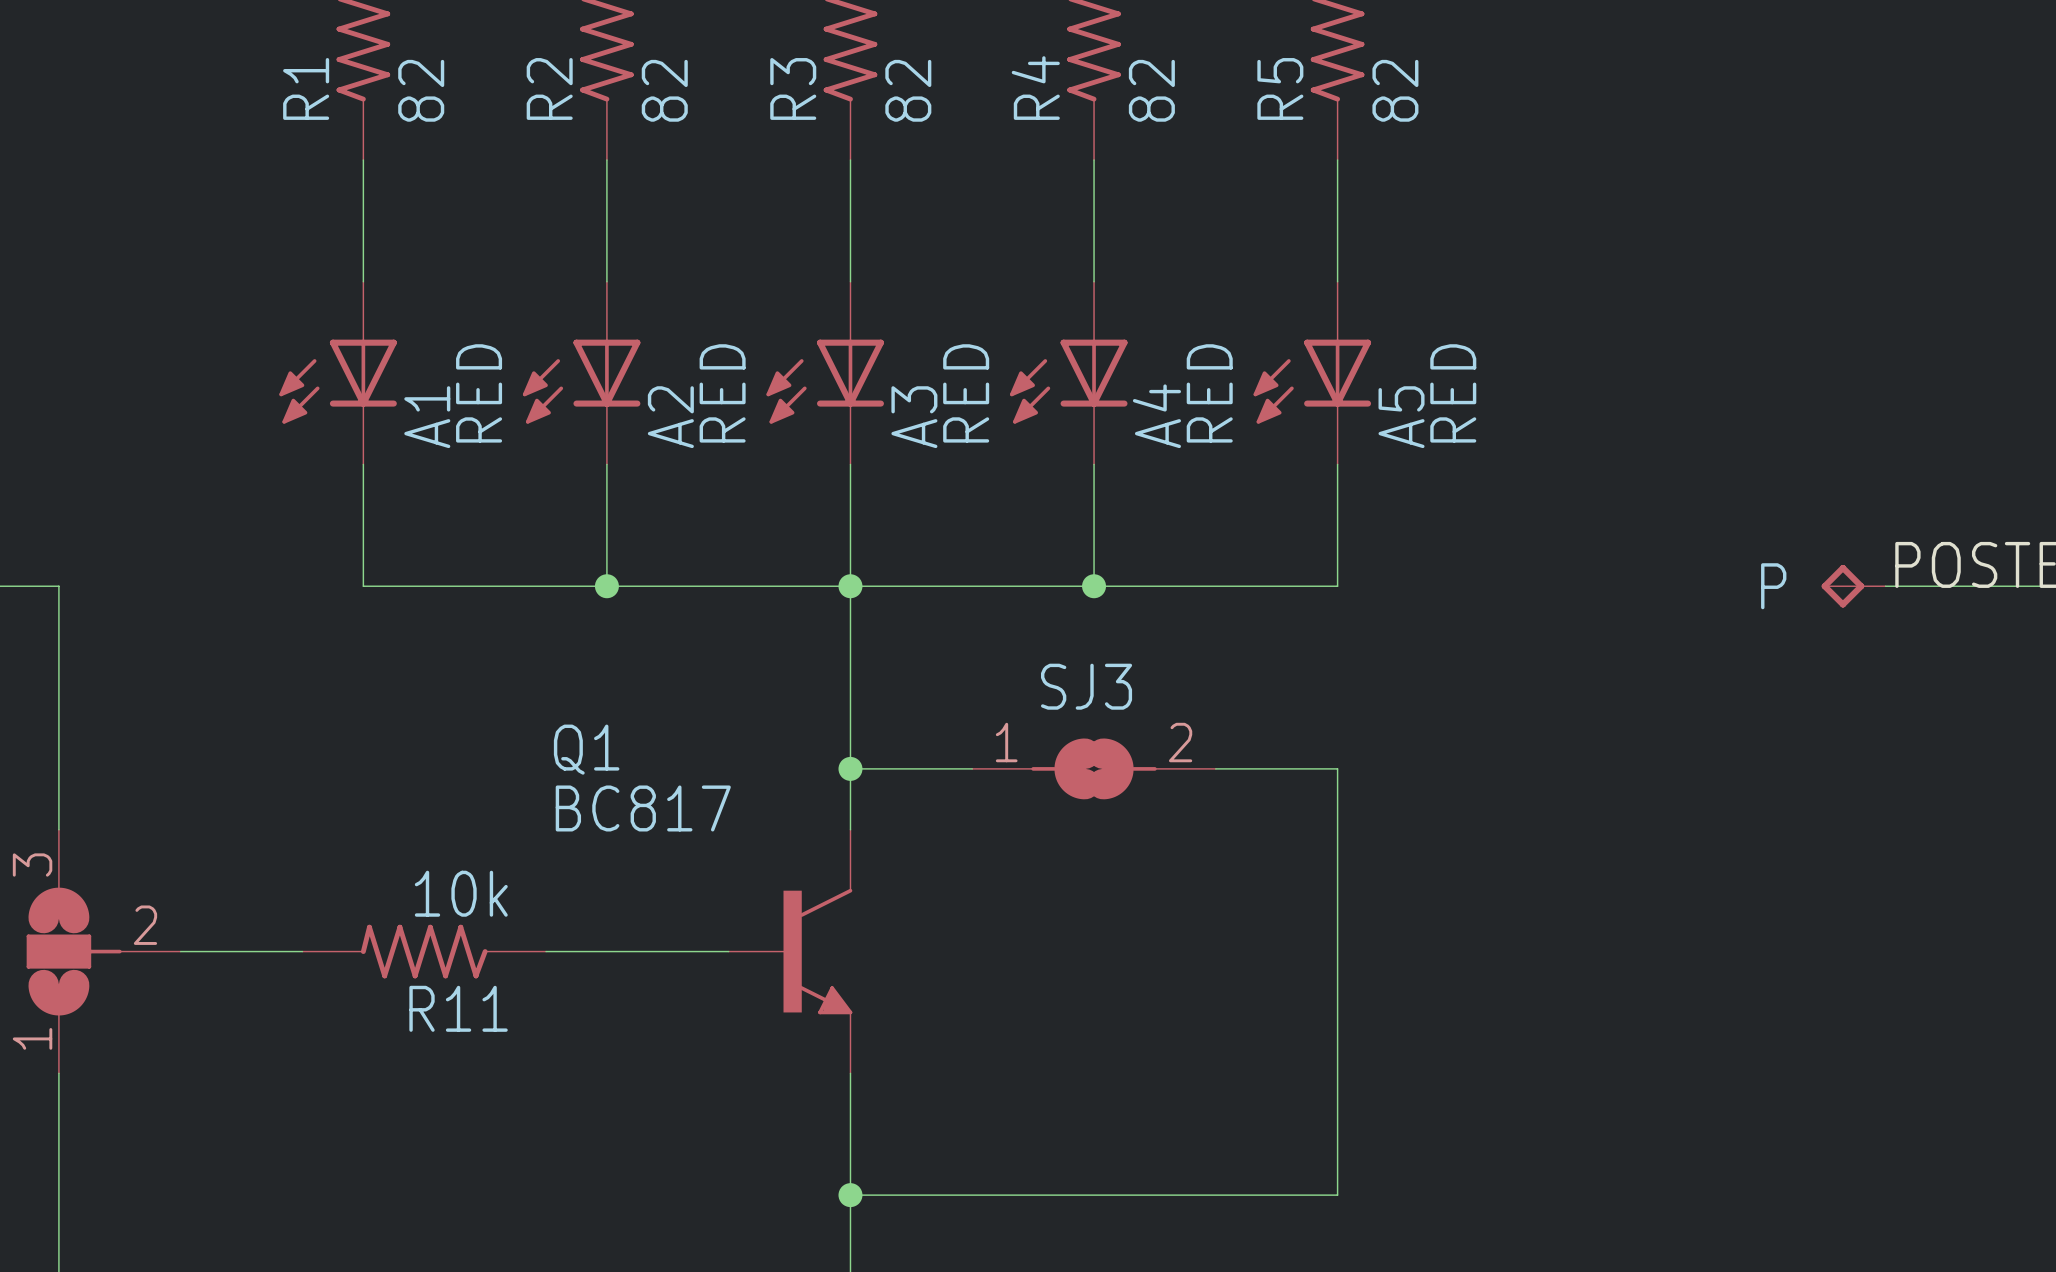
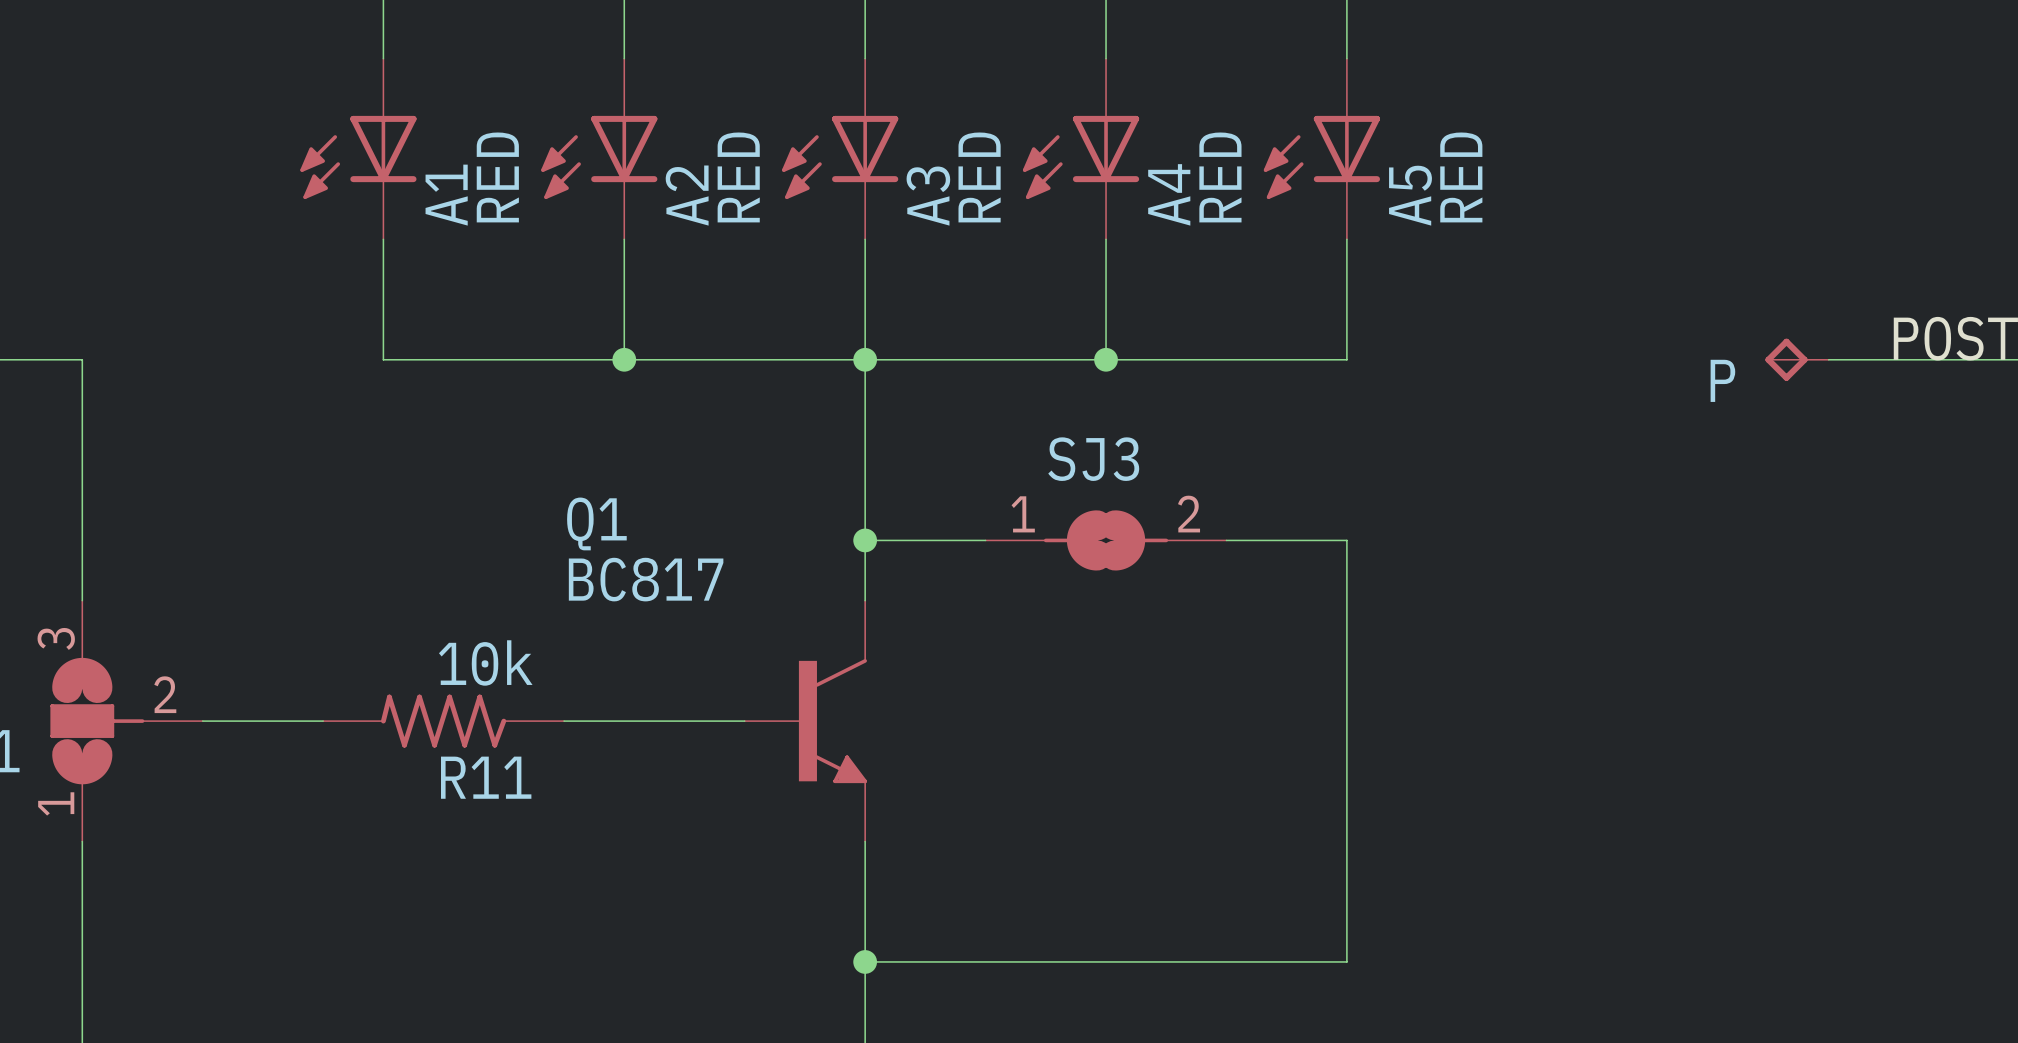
P name position: P (1773, 586) -> P (1722, 380)
P position: (1853, 586) -> (1797, 359)

